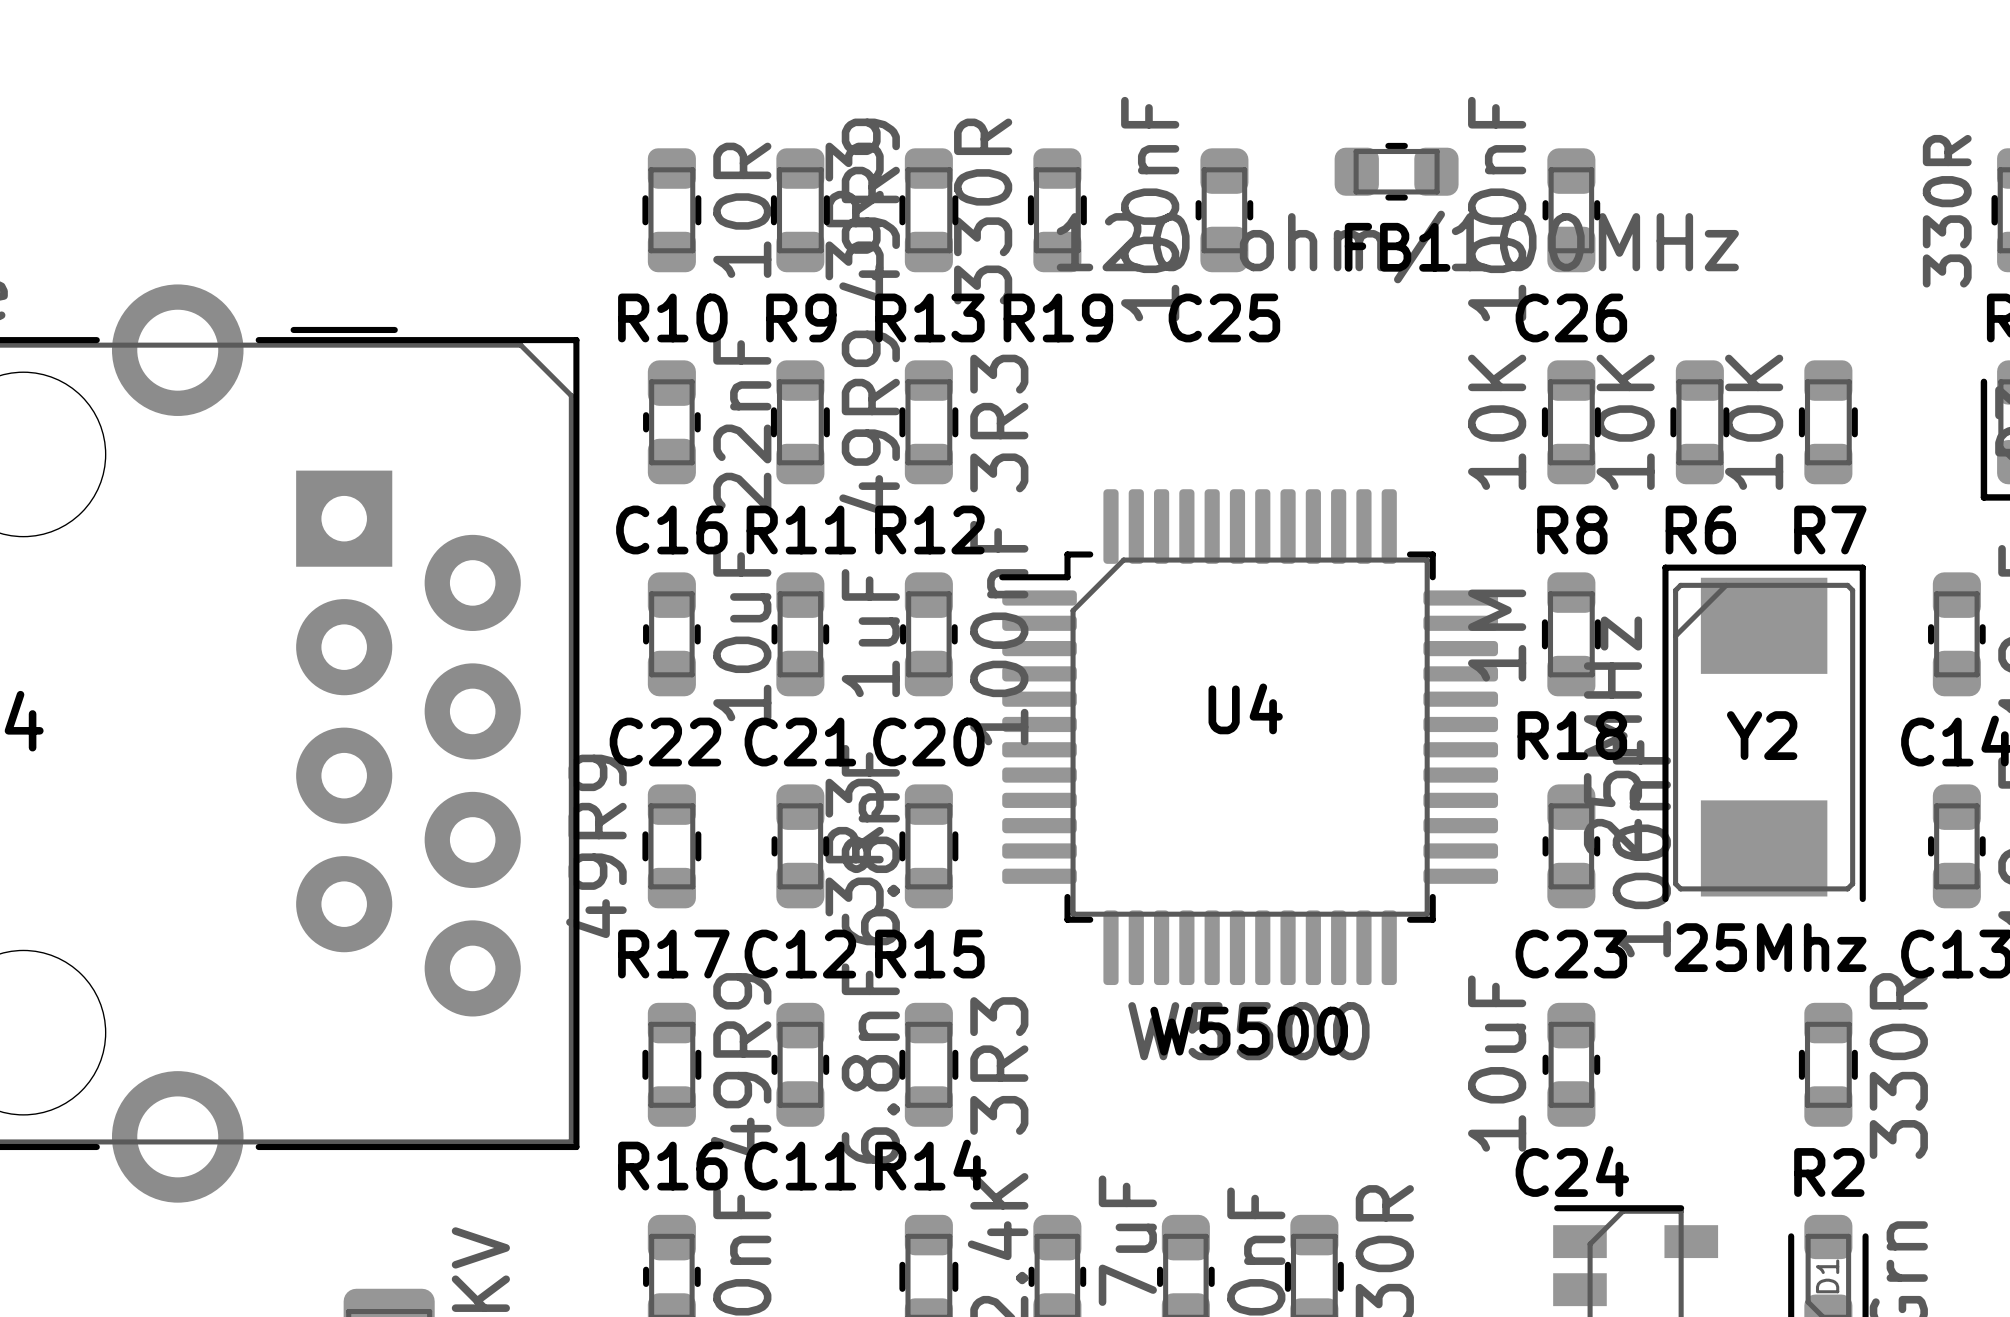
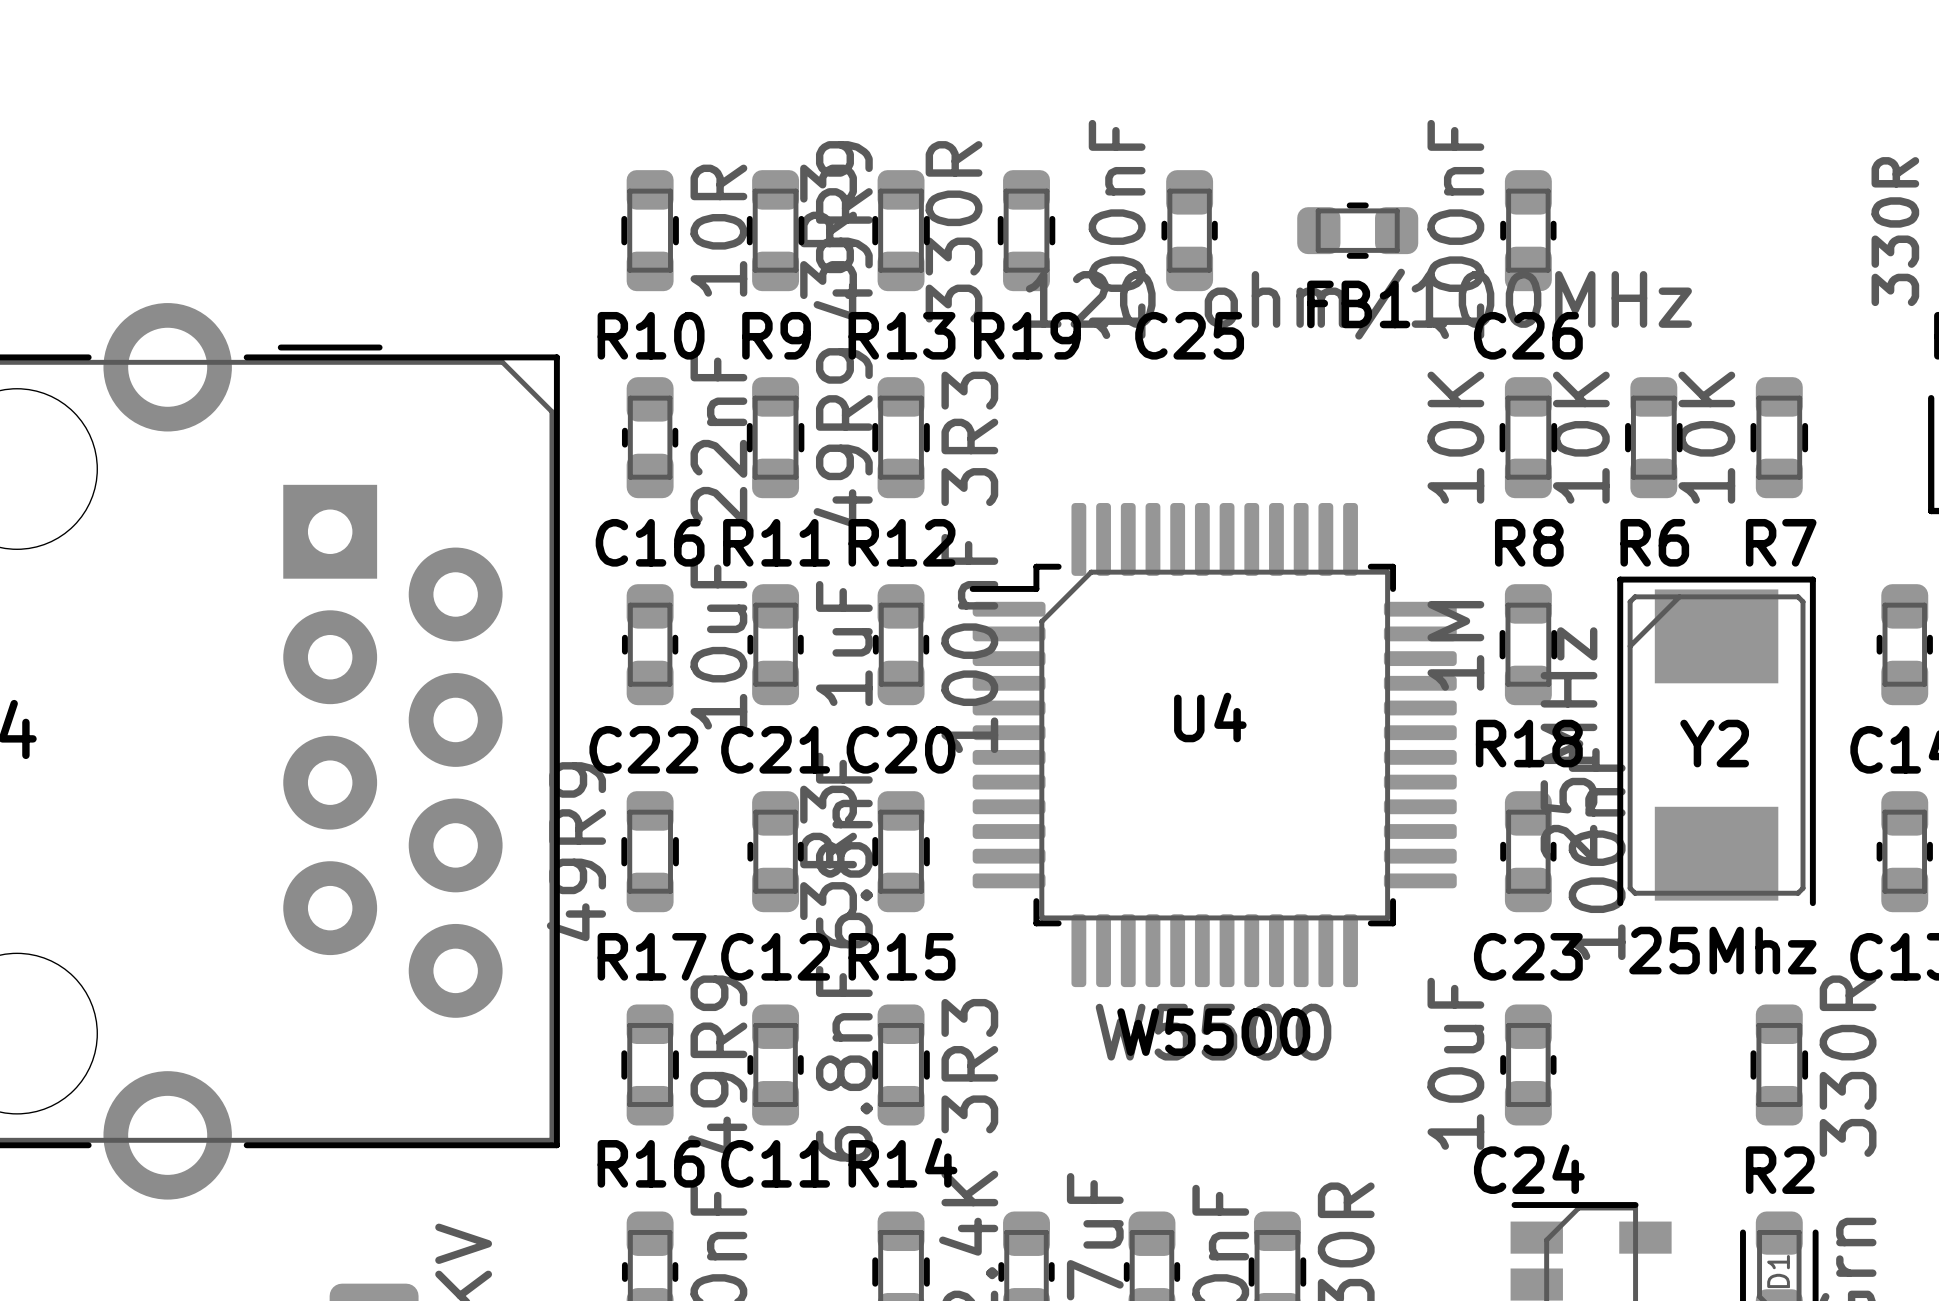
FB1 position: (1396, 171) -> (1357, 230)

